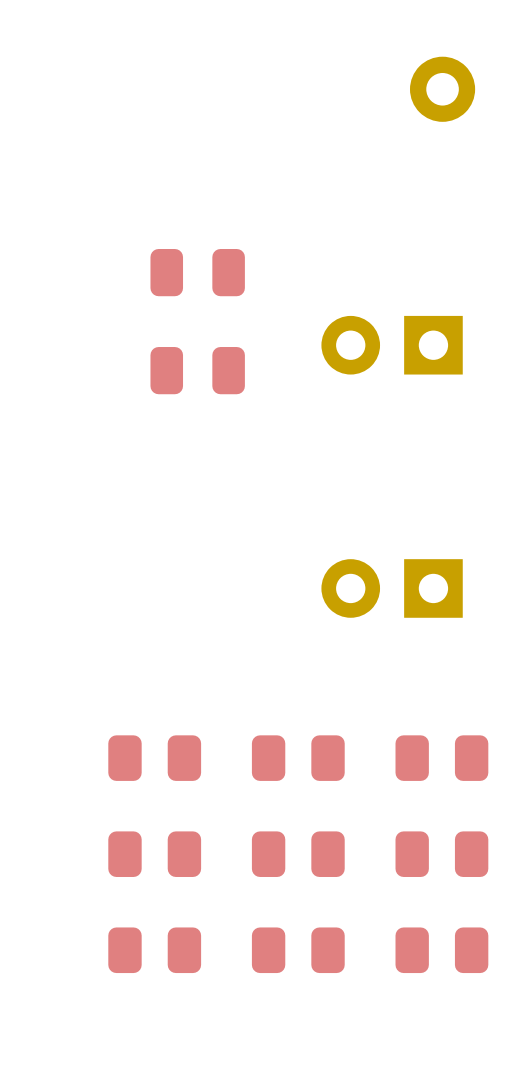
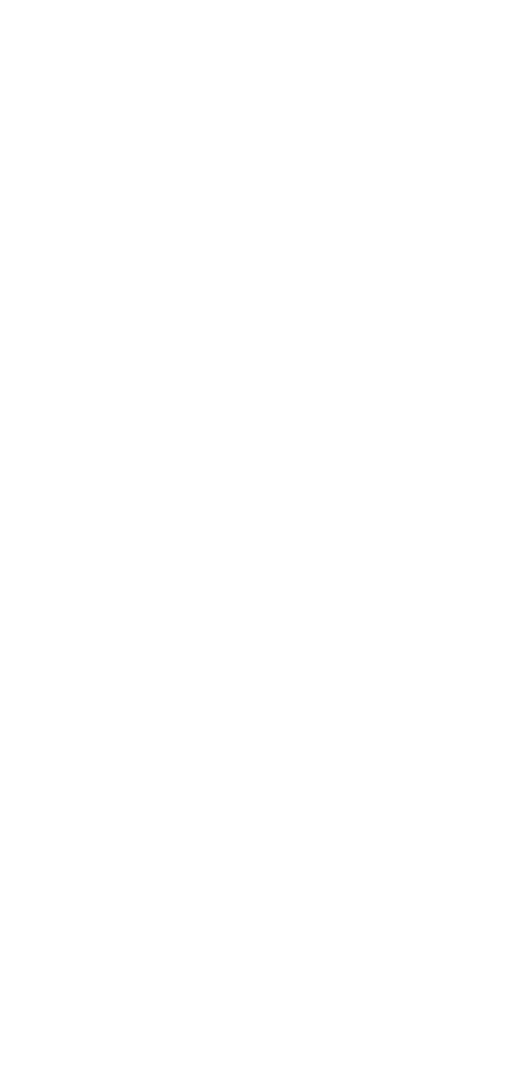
part: (442, 89) -> none
part: (197, 272) -> none
part: (392, 345) -> none
part: (197, 370) -> none
part: (392, 588) -> none
part: (154, 758) -> none
part: (298, 758) -> none
part: (441, 758) -> none
part: (154, 854) -> none
part: (298, 854) -> none
part: (441, 854) -> none
part: (154, 950) -> none
part: (298, 950) -> none
part: (441, 950) -> none

